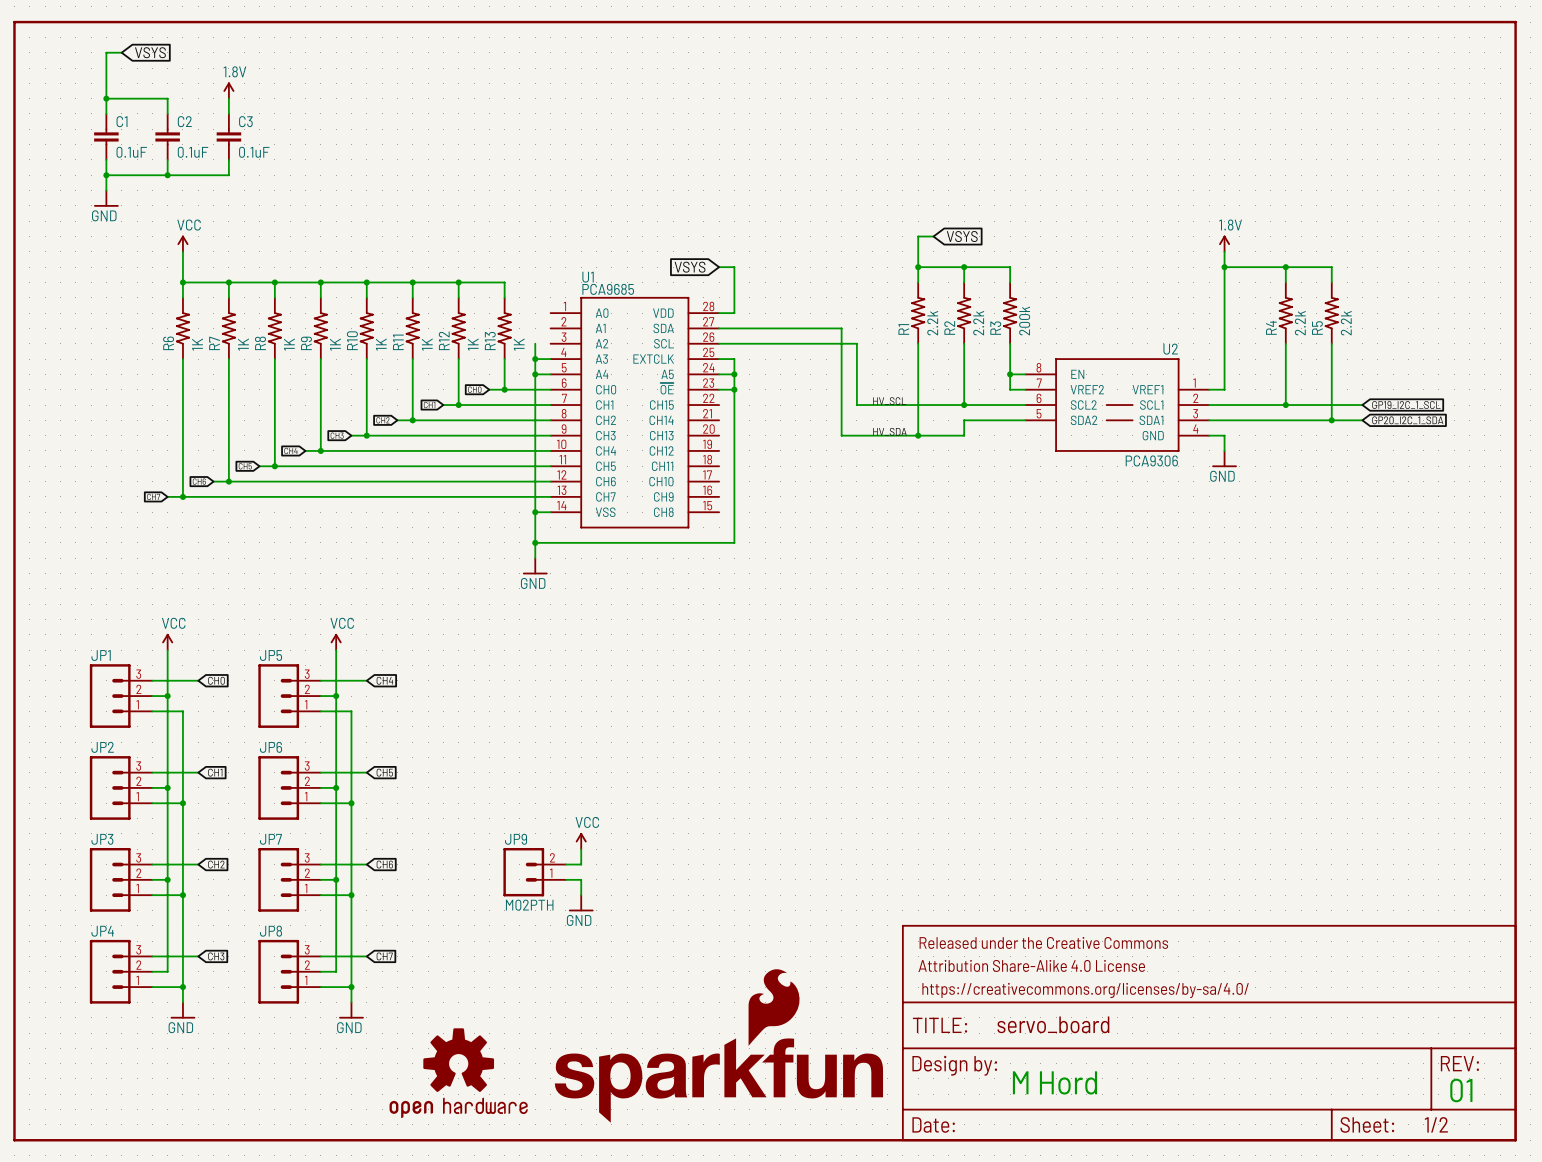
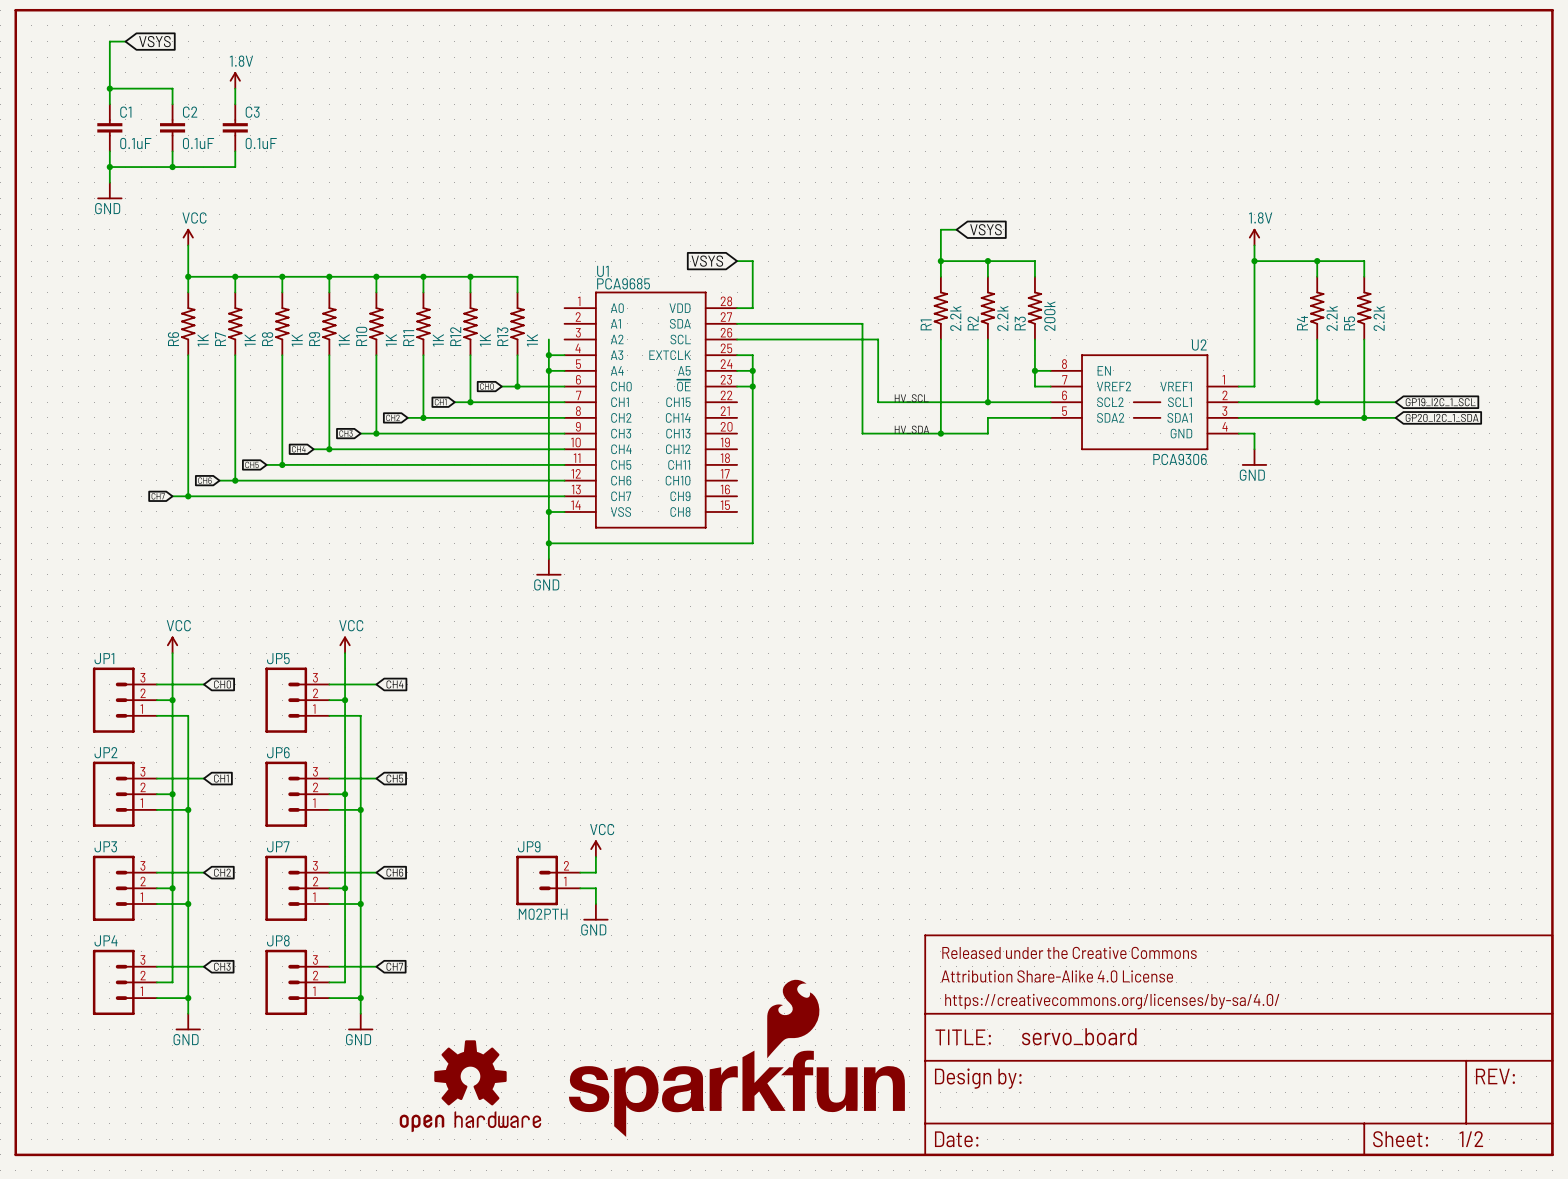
text: M Hord (1054, 1082) -> none
text: 01 (1461, 1090) -> none

